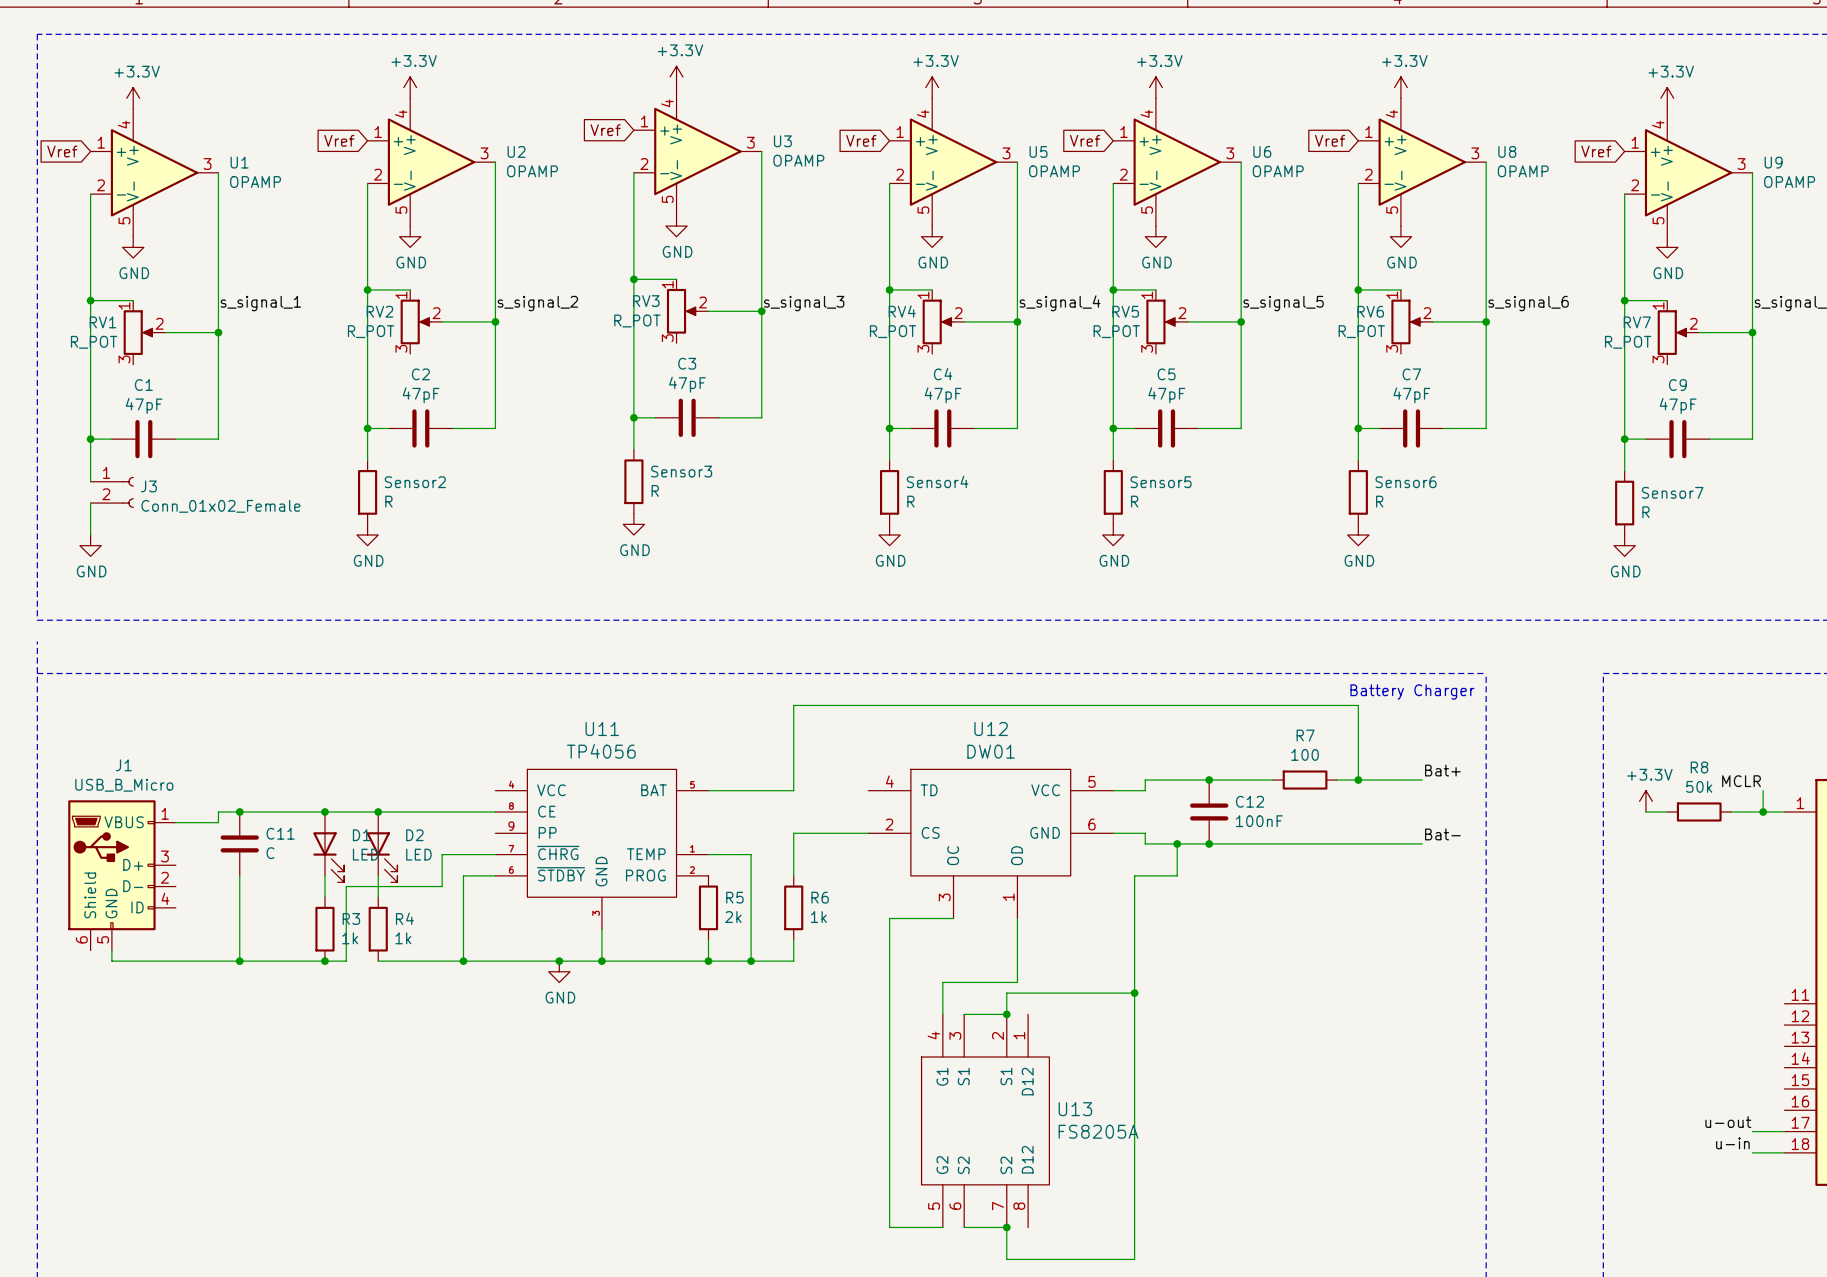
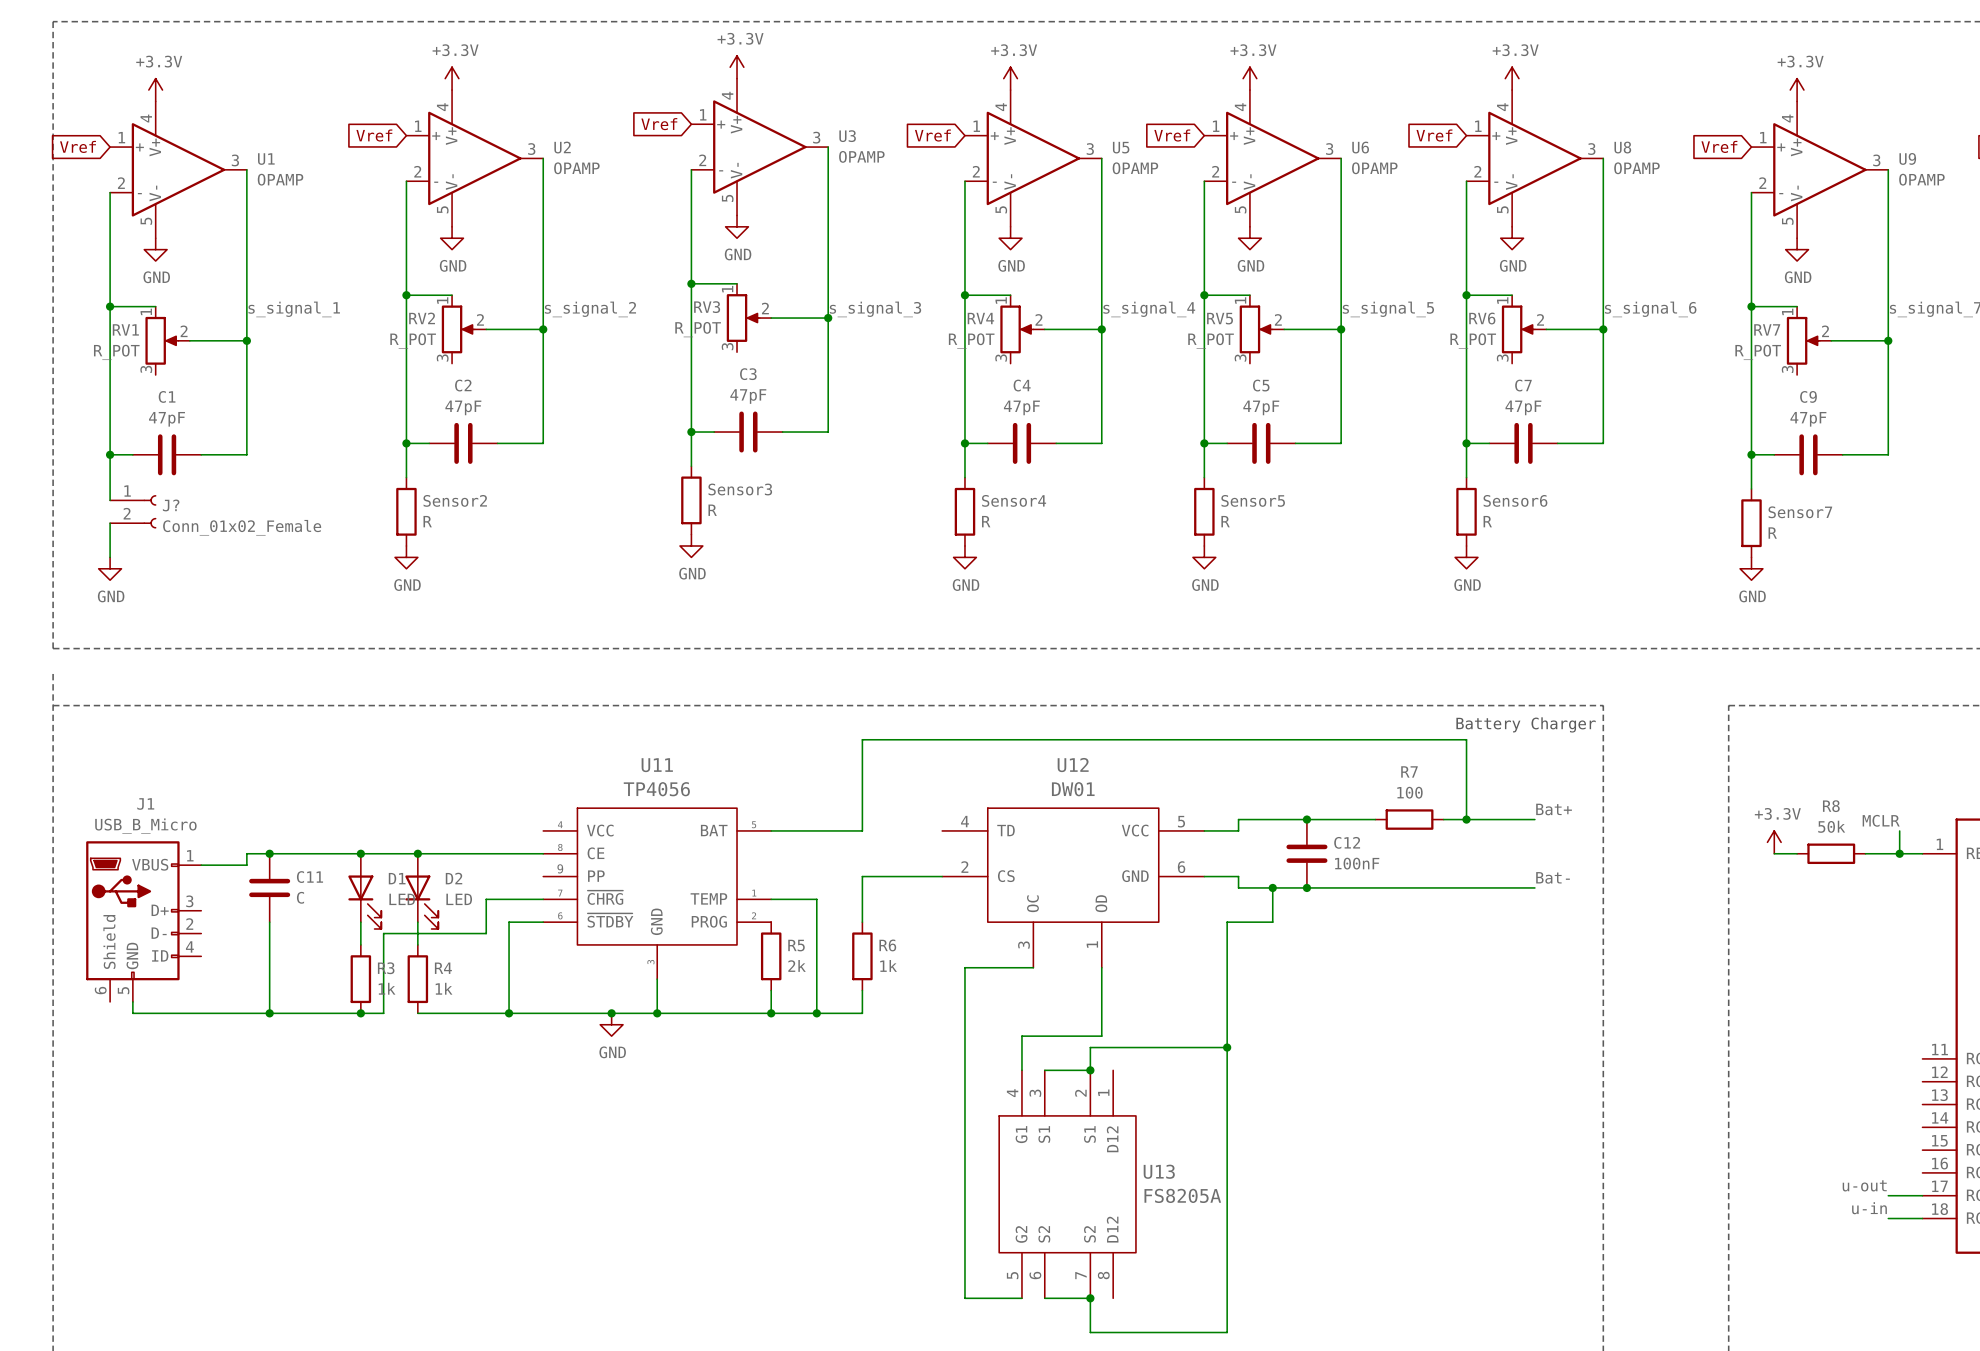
J3 name: J3 (148, 486) -> J? (171, 505)

